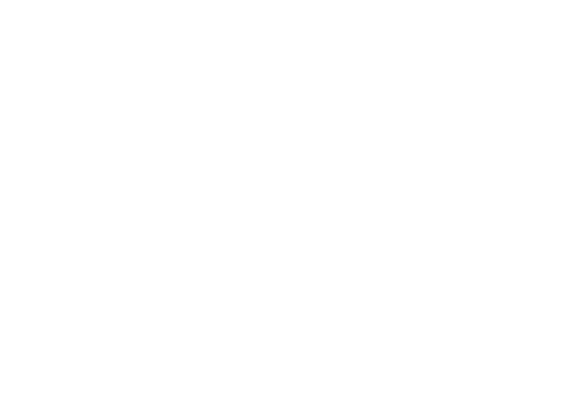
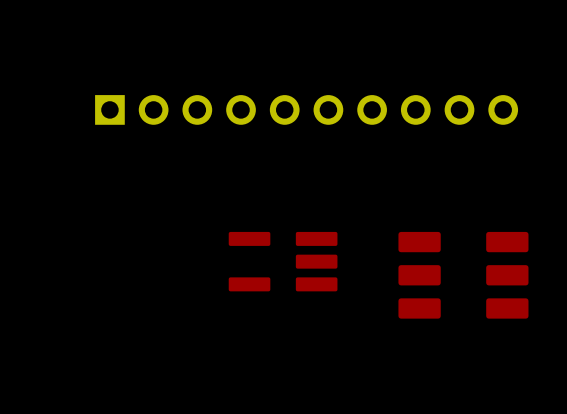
part: none -> (306, 109)
part: none -> (283, 261)
part: none -> (463, 275)

